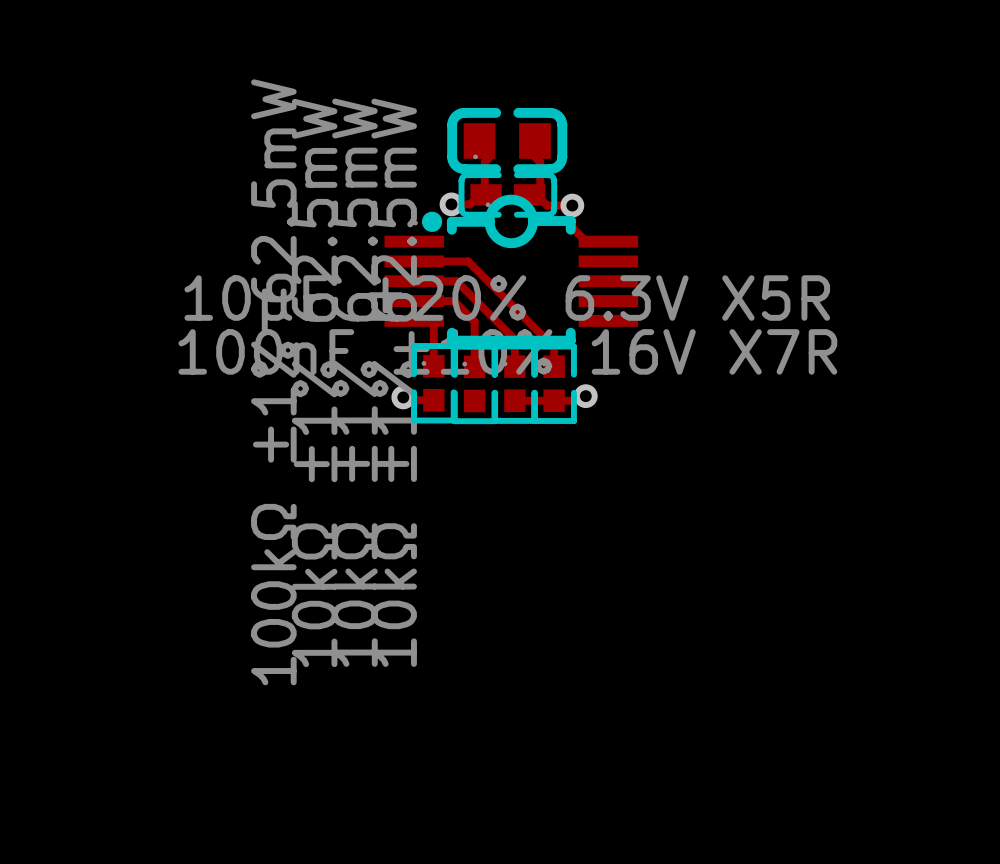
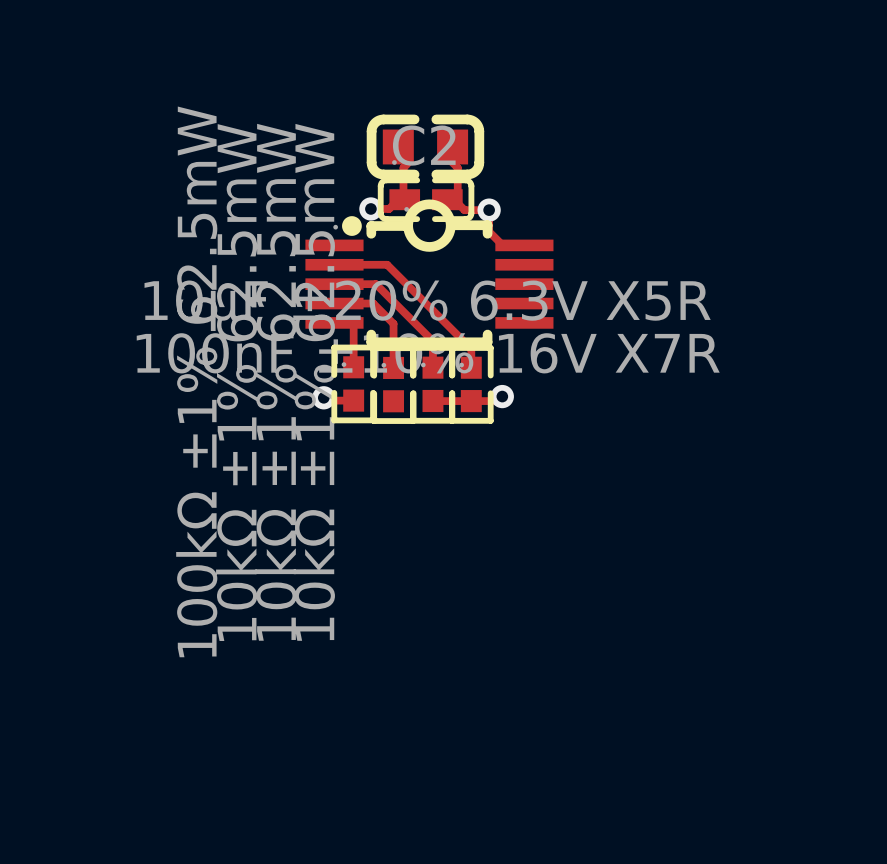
C2 name: none -> C2 (424, 145)

